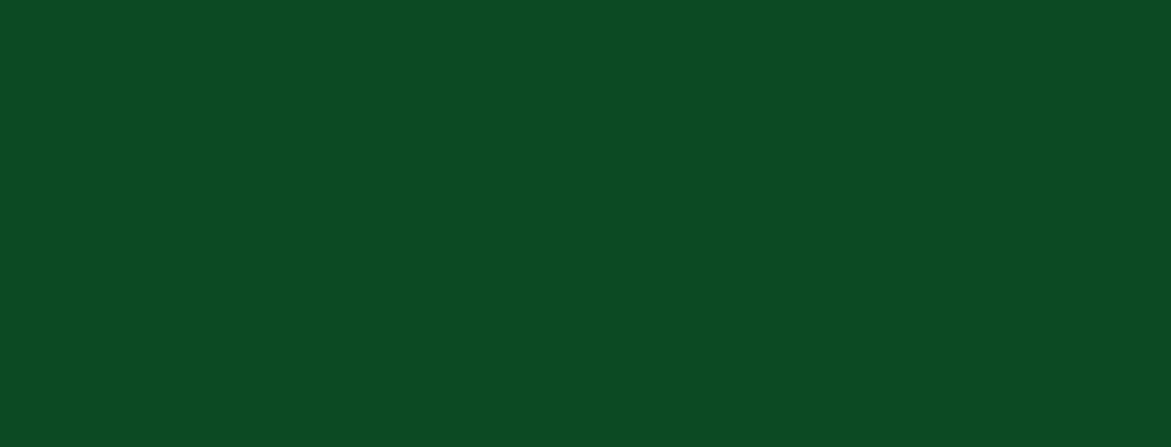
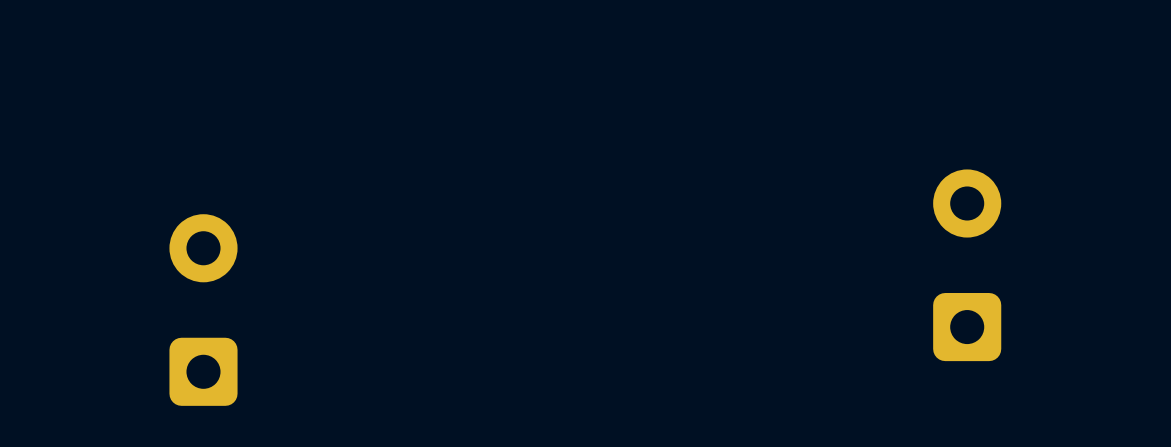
part: none -> (967, 265)
part: none -> (203, 310)

